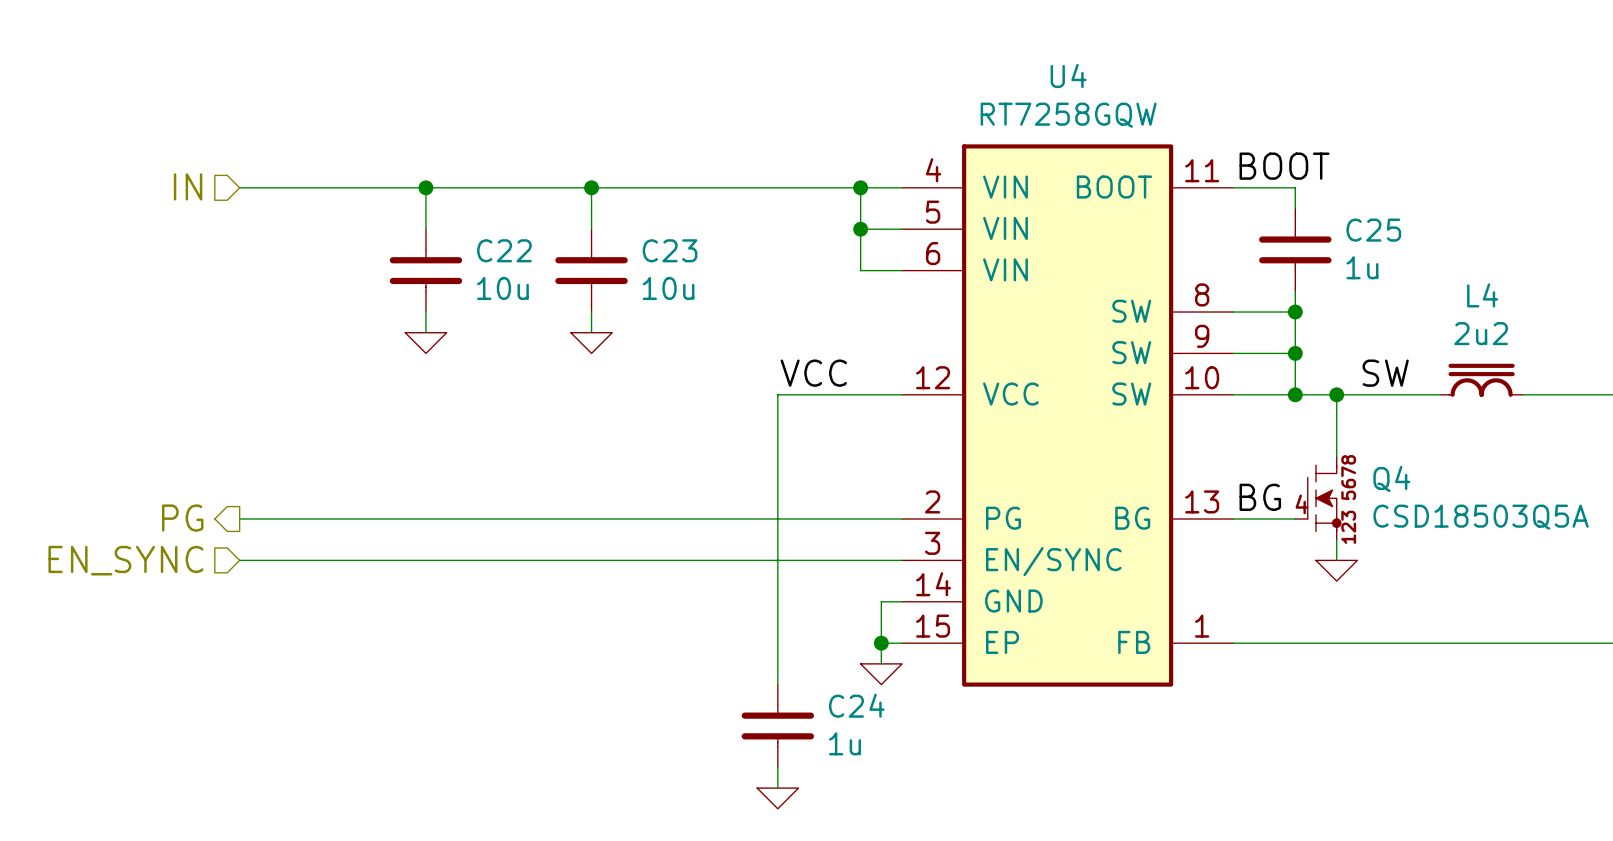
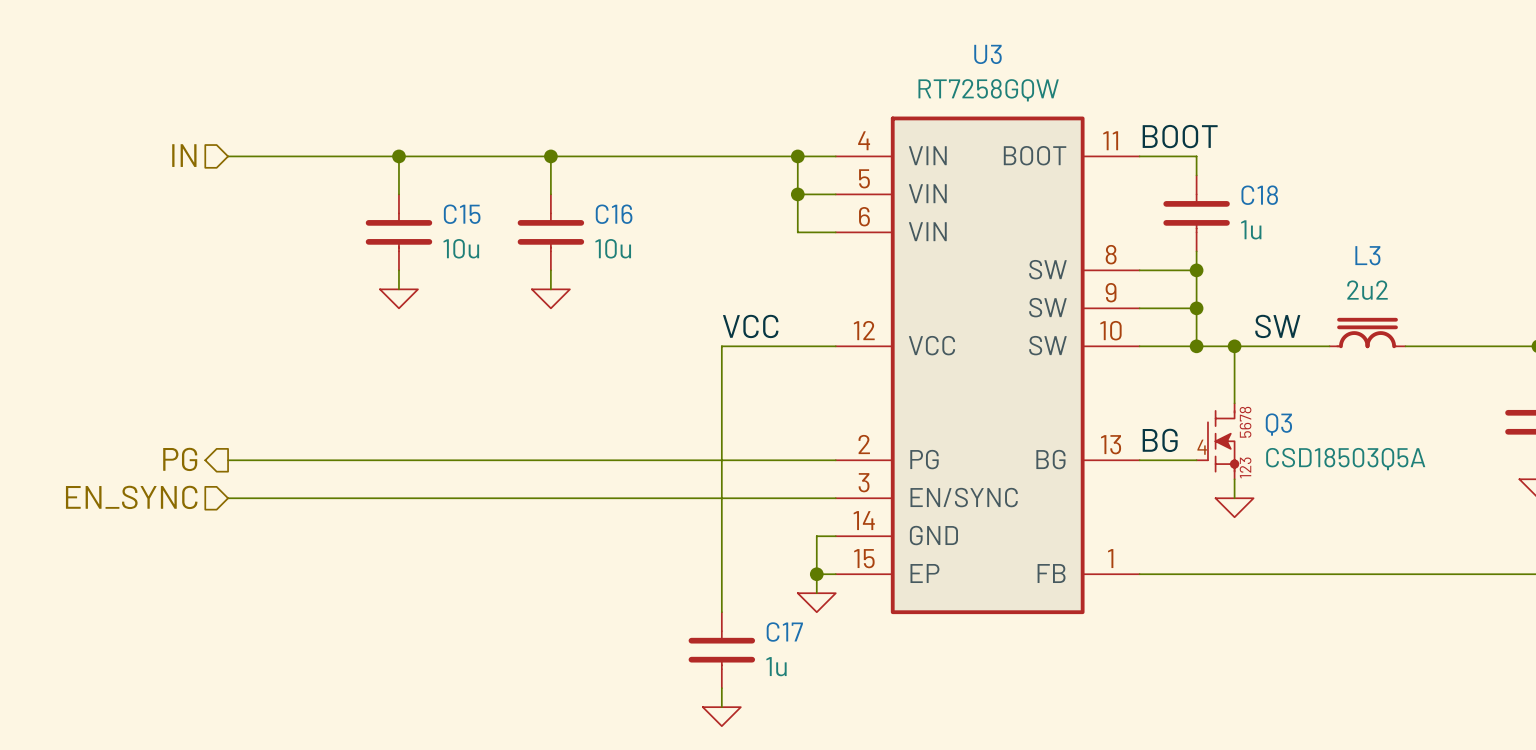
U4 name: U4 (1068, 76) -> U3 (987, 54)
C25 name: C25 (1373, 230) -> C18 (1259, 195)
C22 name: C22 (504, 250) -> C15 (462, 214)
C23 name: C23 (670, 250) -> C16 (614, 214)
L4 name: L4 (1482, 295) -> L3 (1367, 255)
Q4 name: Q4 (1391, 478) -> Q3 (1278, 424)
C24 name: C24 (856, 705) -> C17 (784, 632)

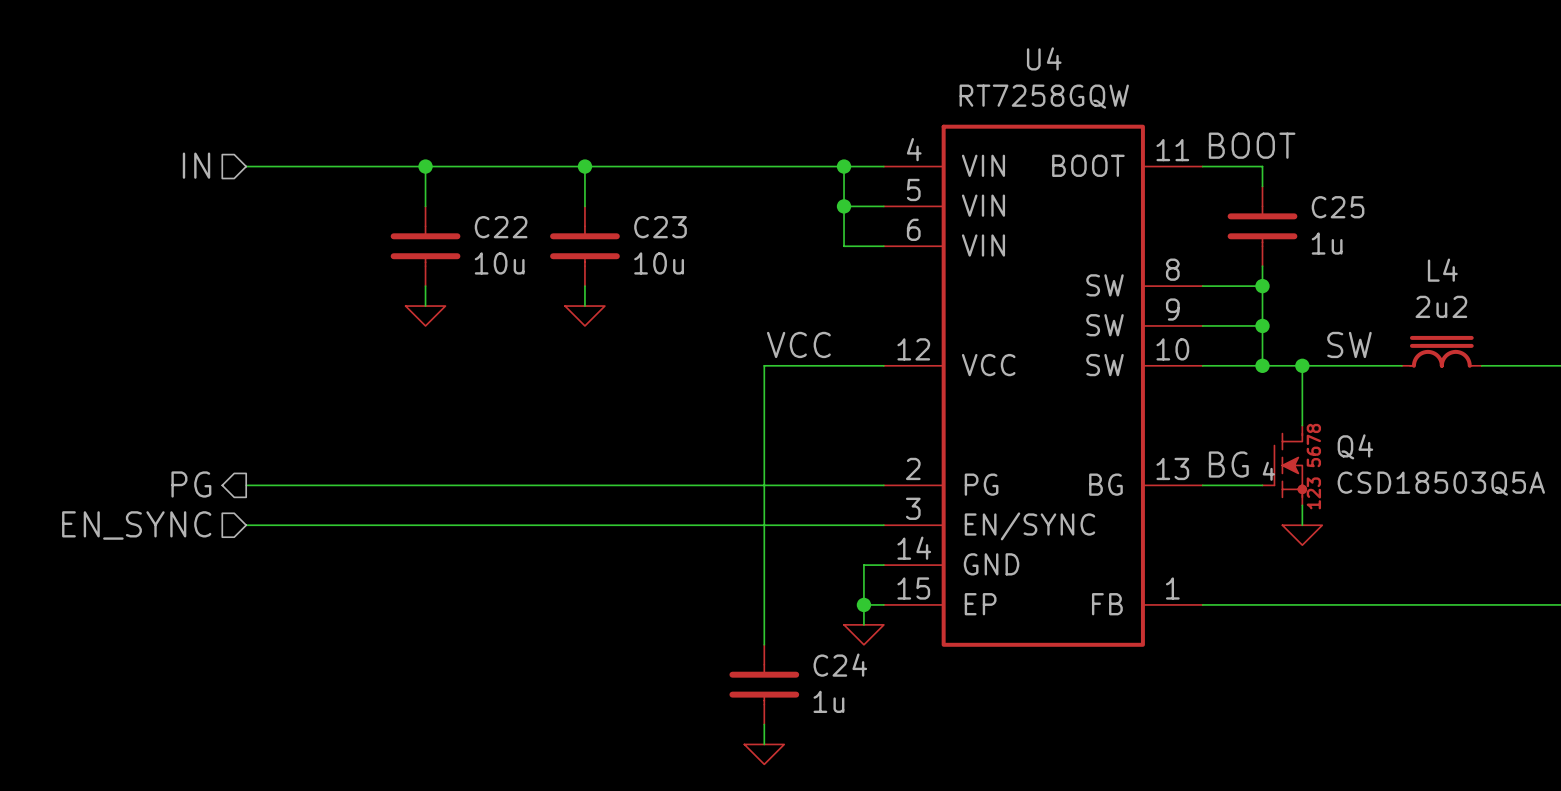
U3 name: U3 (987, 54) -> U4 (1044, 58)
C18 name: C18 (1259, 195) -> C25 (1338, 207)
C15 name: C15 (462, 214) -> C22 (501, 227)
C16 name: C16 (614, 214) -> C23 (660, 227)
L3 name: L3 (1367, 255) -> L4 (1442, 270)
Q3 name: Q3 (1278, 424) -> Q4 (1355, 446)
C17 name: C17 (784, 632) -> C24 (840, 665)

